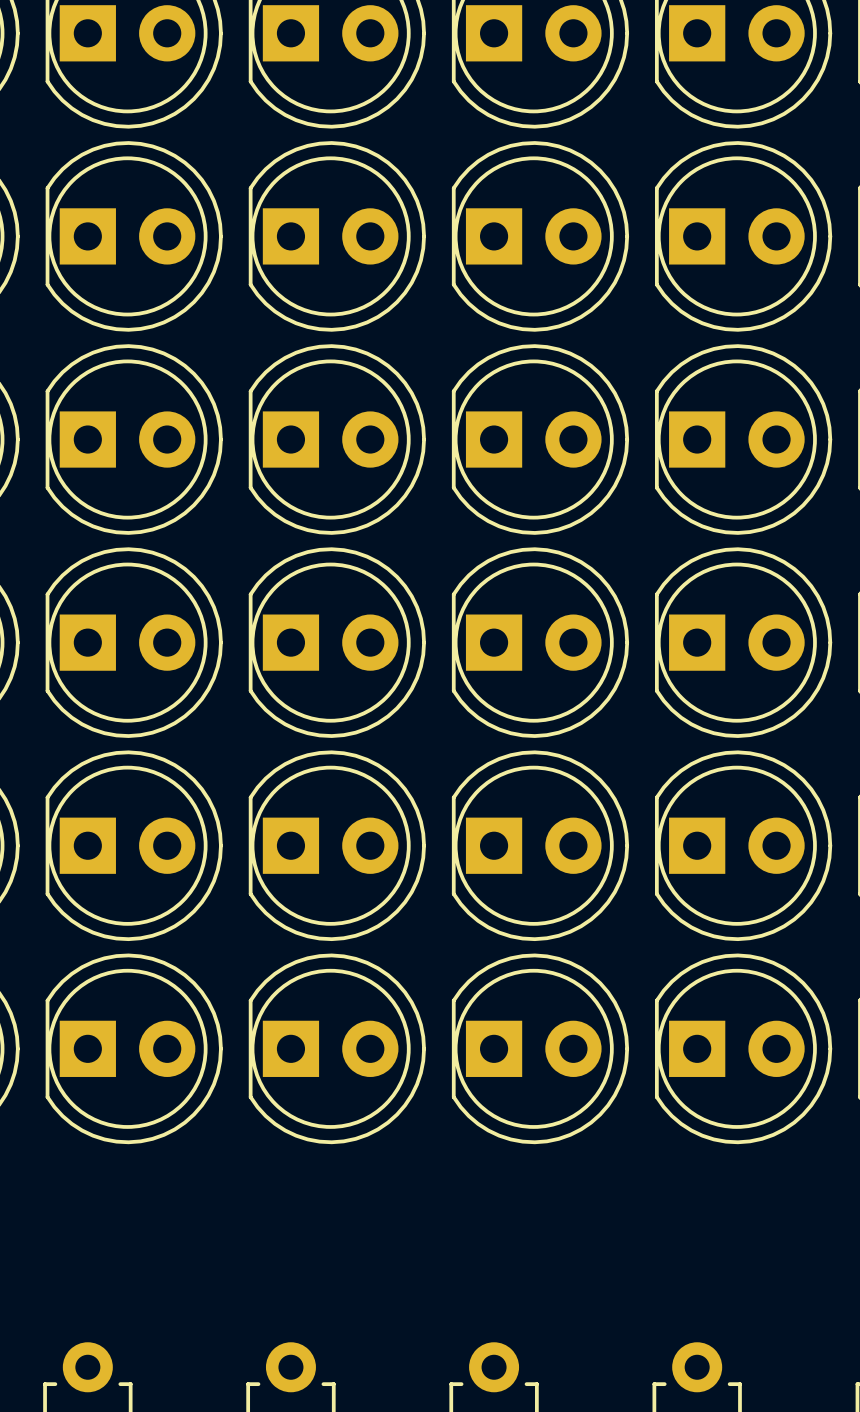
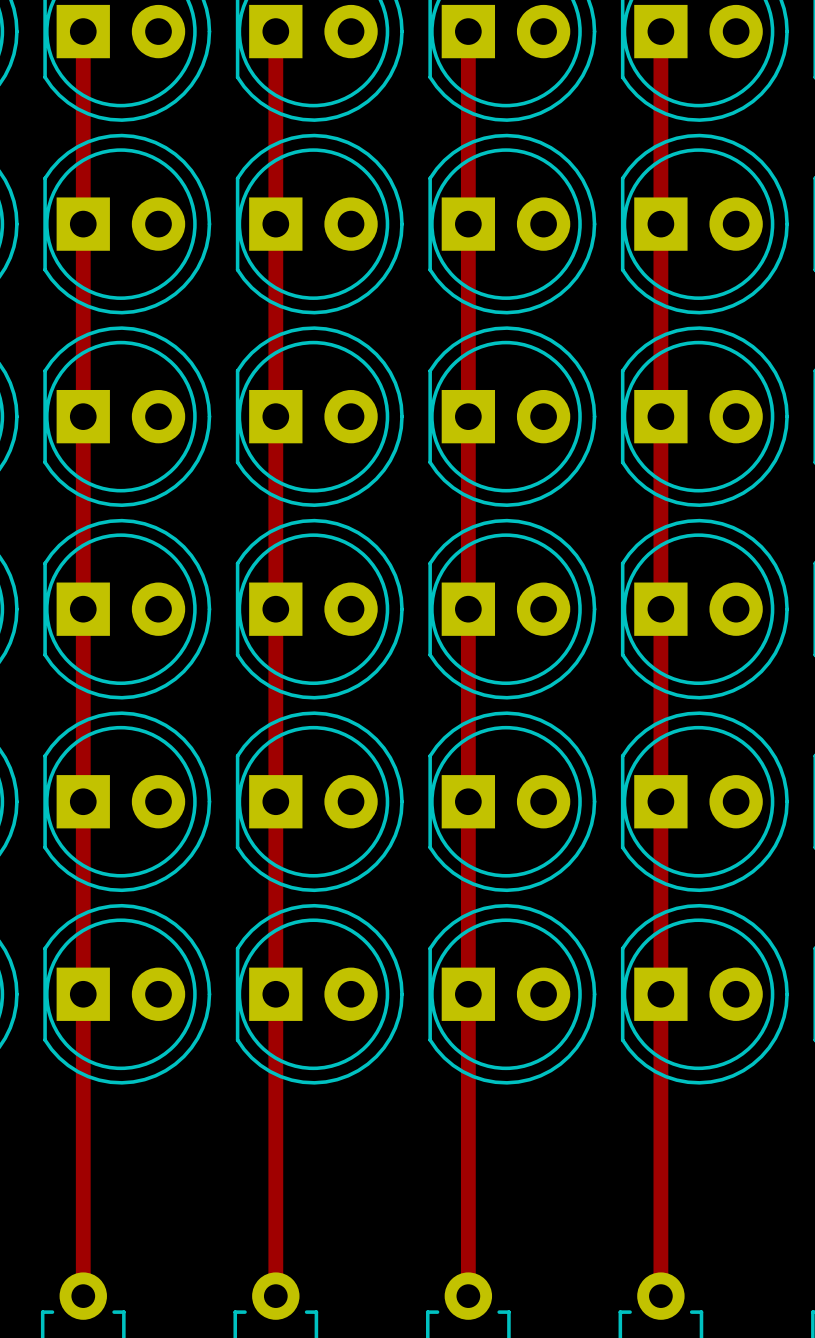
track: none -> (83, 31) (83, 1296)
track: none -> (275, 31) (275, 1296)
track: none -> (468, 31) (468, 1296)
track: none -> (660, 31) (660, 1296)

